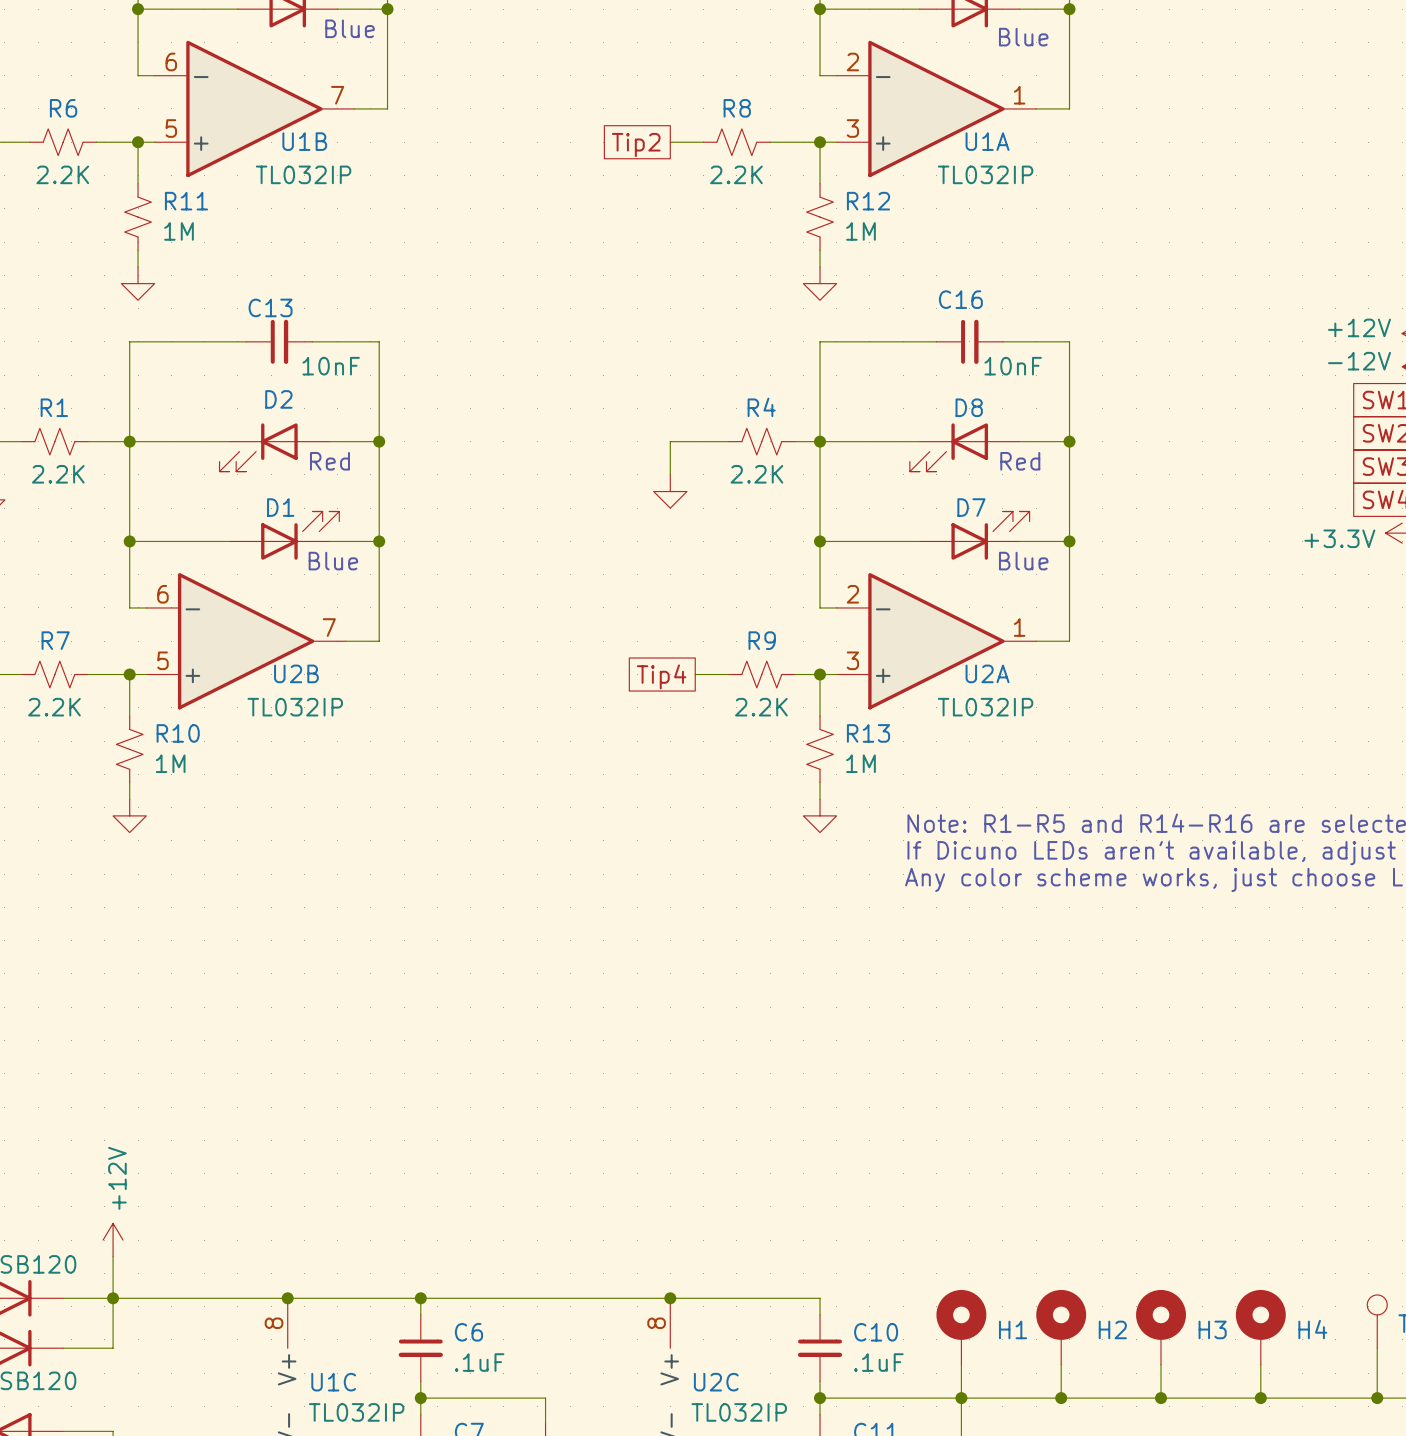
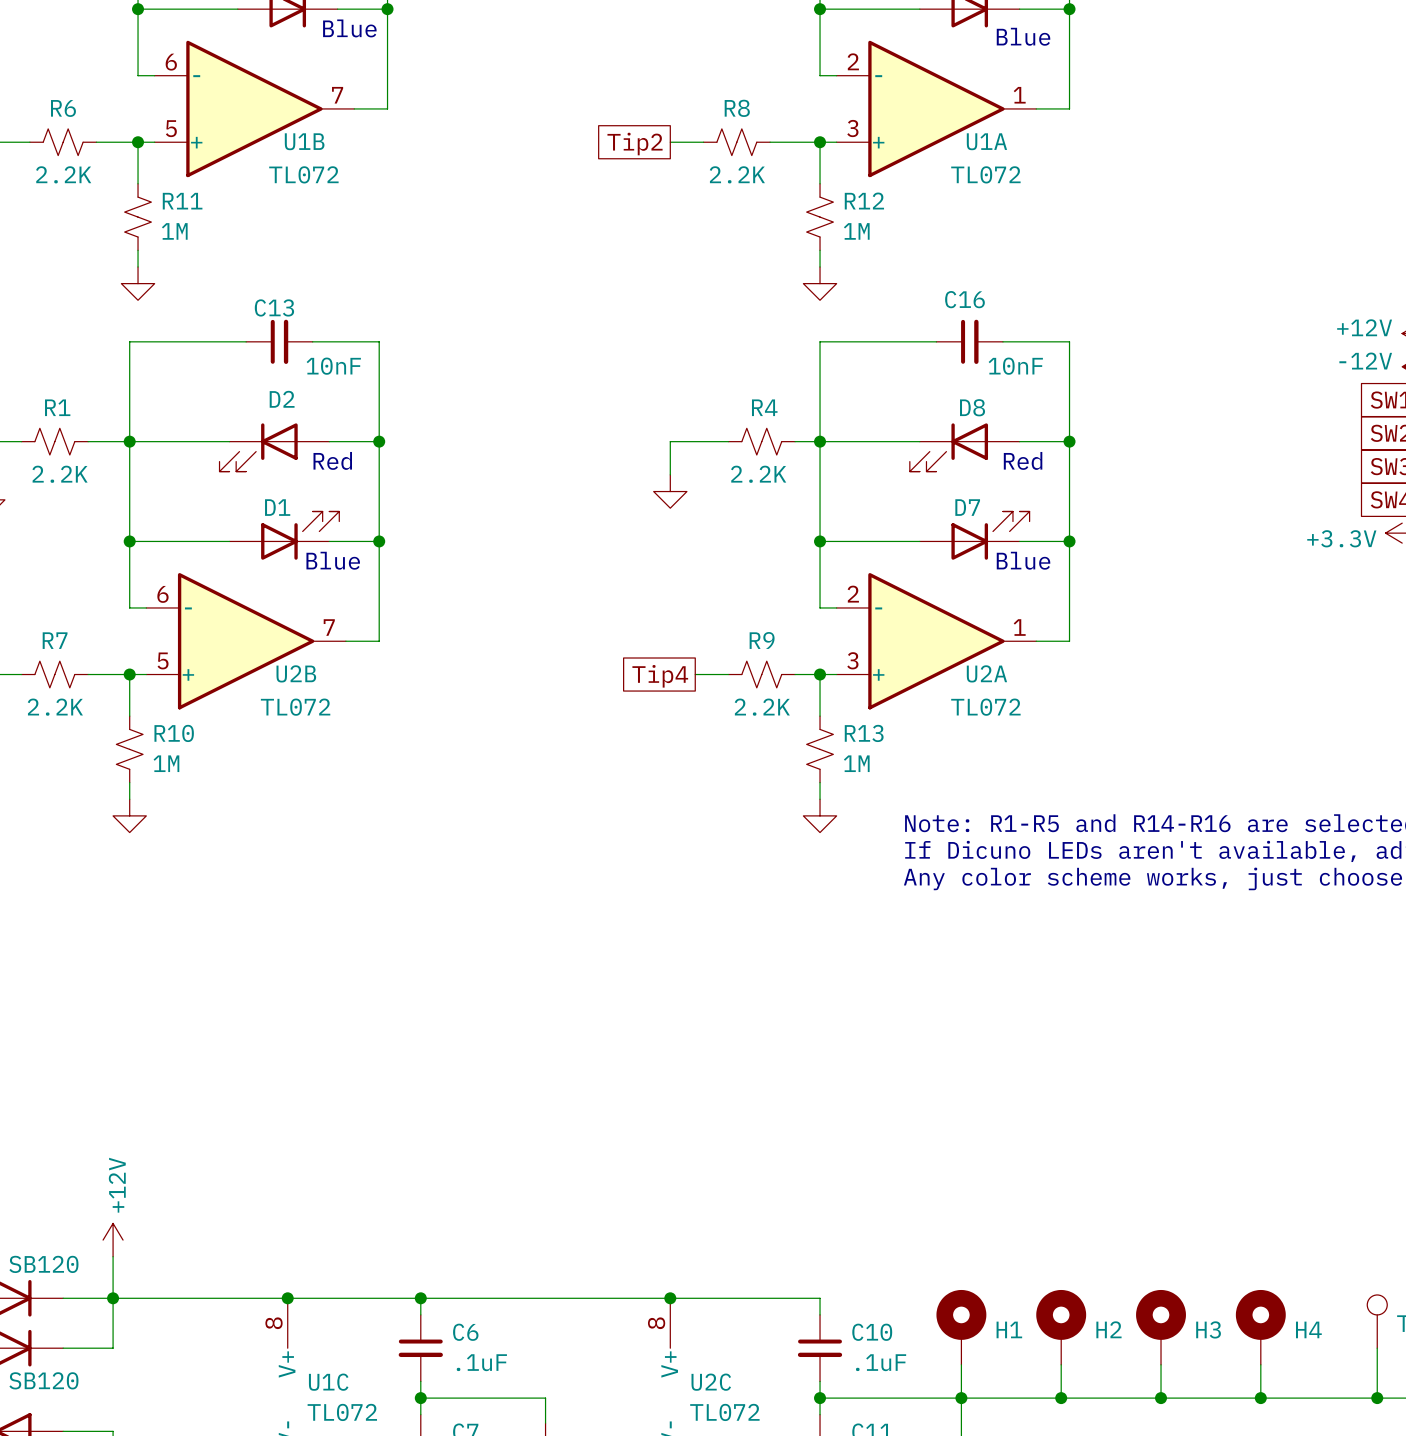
U1B value: TL032IP (303, 174) -> TL072 (303, 174)
U1A value: TL032IP (985, 174) -> TL072 (985, 174)
U2B value: TL032IP (295, 707) -> TL072 (295, 707)
U2A value: TL032IP (985, 707) -> TL072 (985, 707)
U1C value: TL032IP (356, 1412) -> TL072 (342, 1412)
U2C value: TL032IP (739, 1412) -> TL072 (724, 1412)

